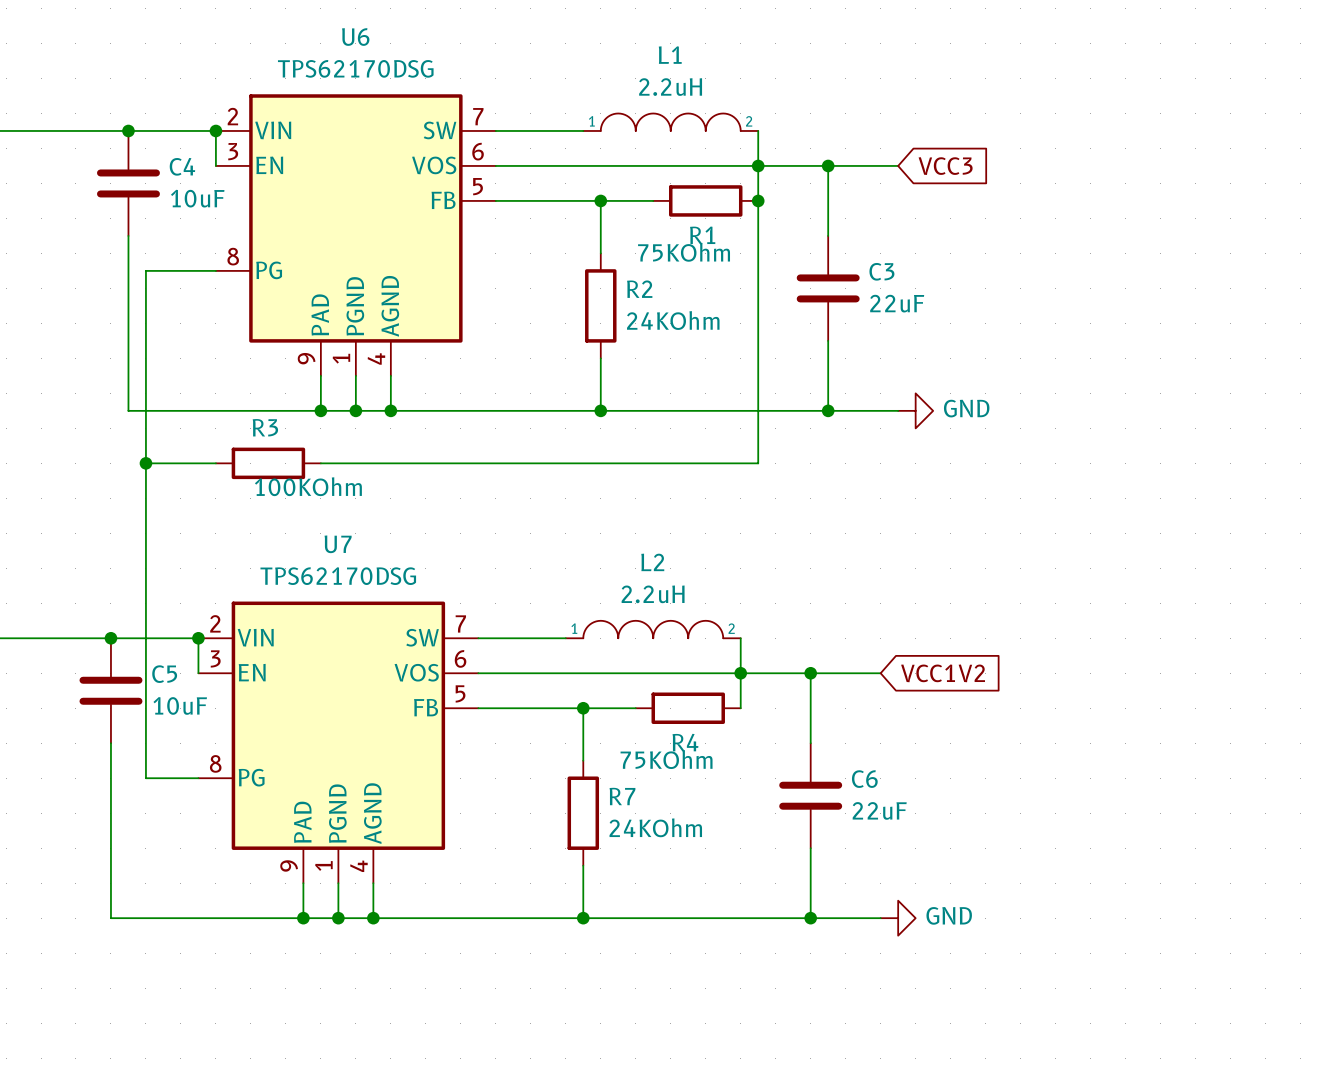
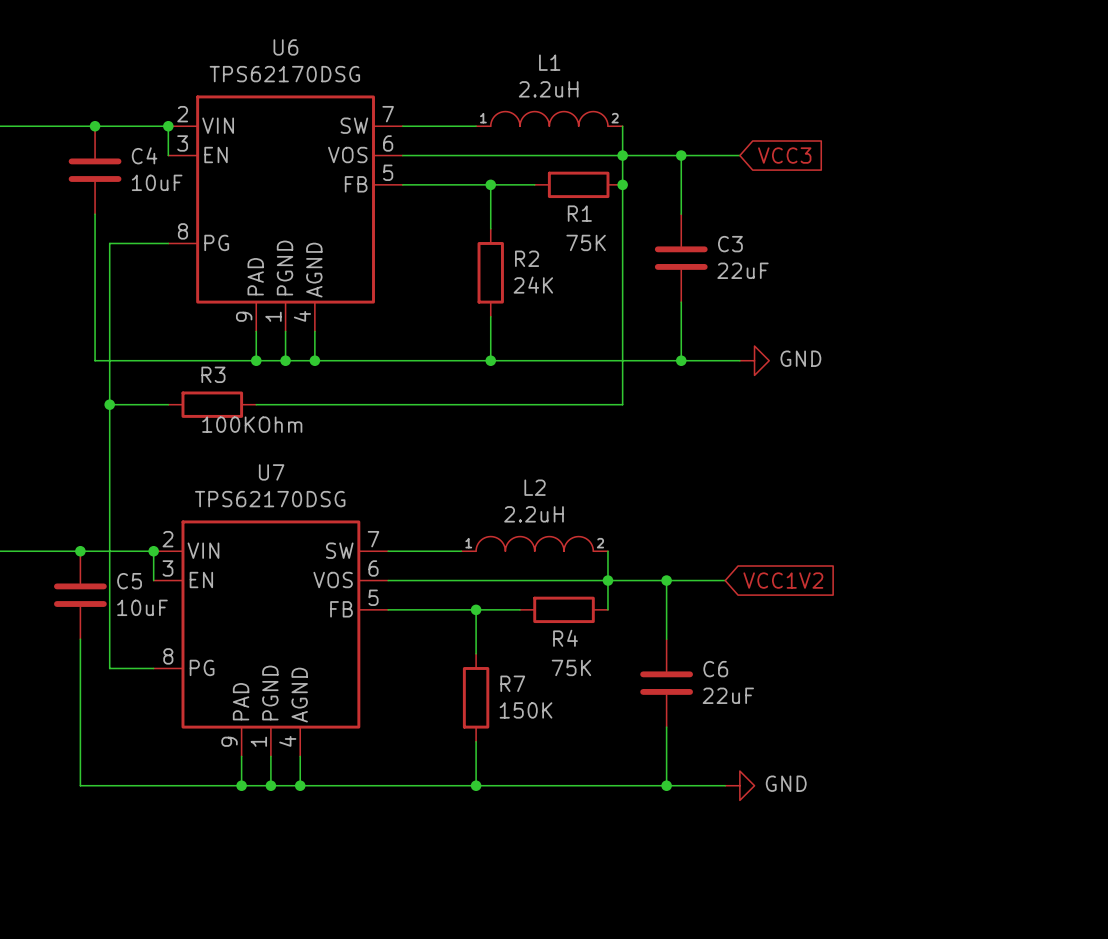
R1 value: 75KOhm (684, 252) -> 75K (586, 242)
R2 value: 24KOhm (673, 320) -> 24K (533, 285)
R4 value: 75KOhm (666, 759) -> 75K (571, 667)
R7 value: 24KOhm (655, 827) -> 150K (526, 710)

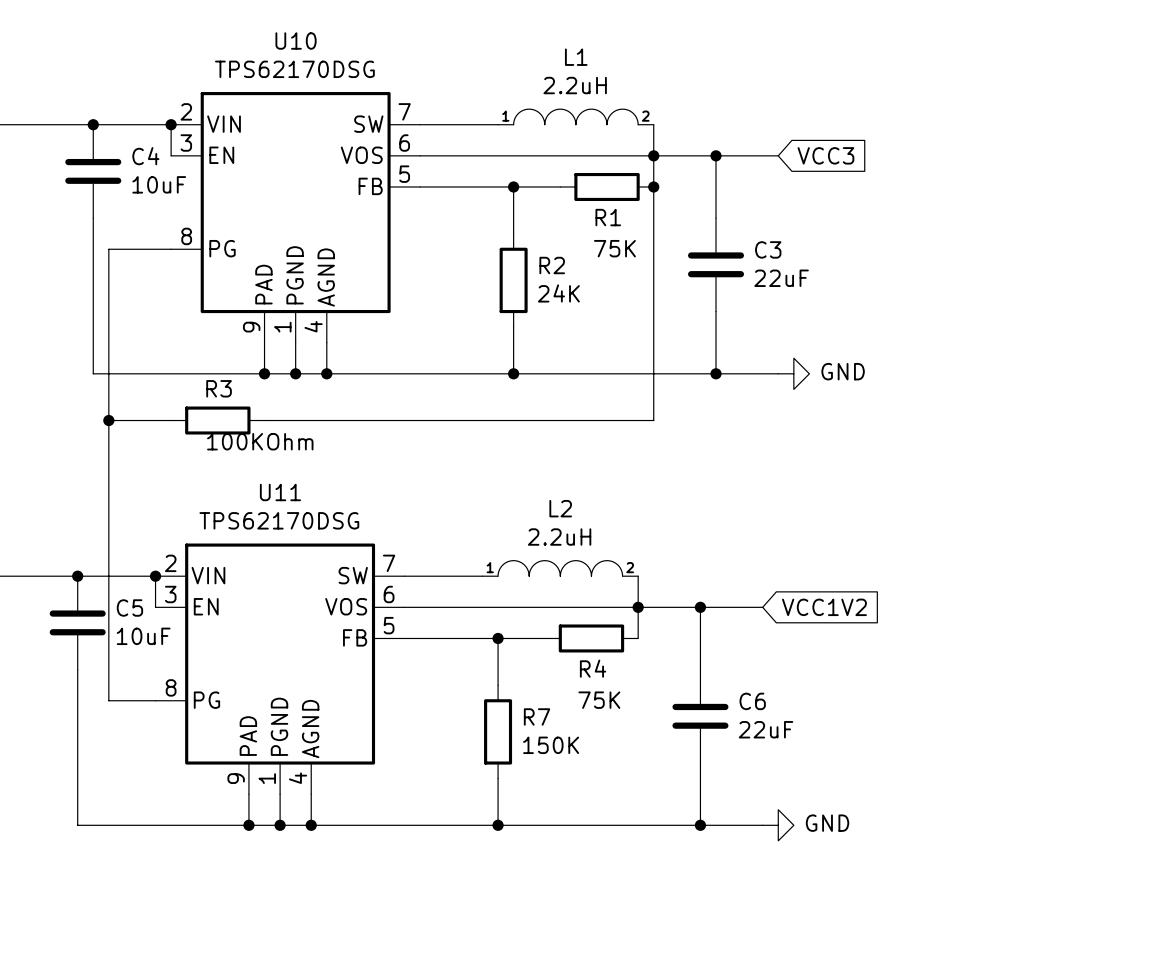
U6 name: U6 (285, 47) -> U10 (296, 41)
U7 name: U7 (271, 472) -> U11 (280, 492)

